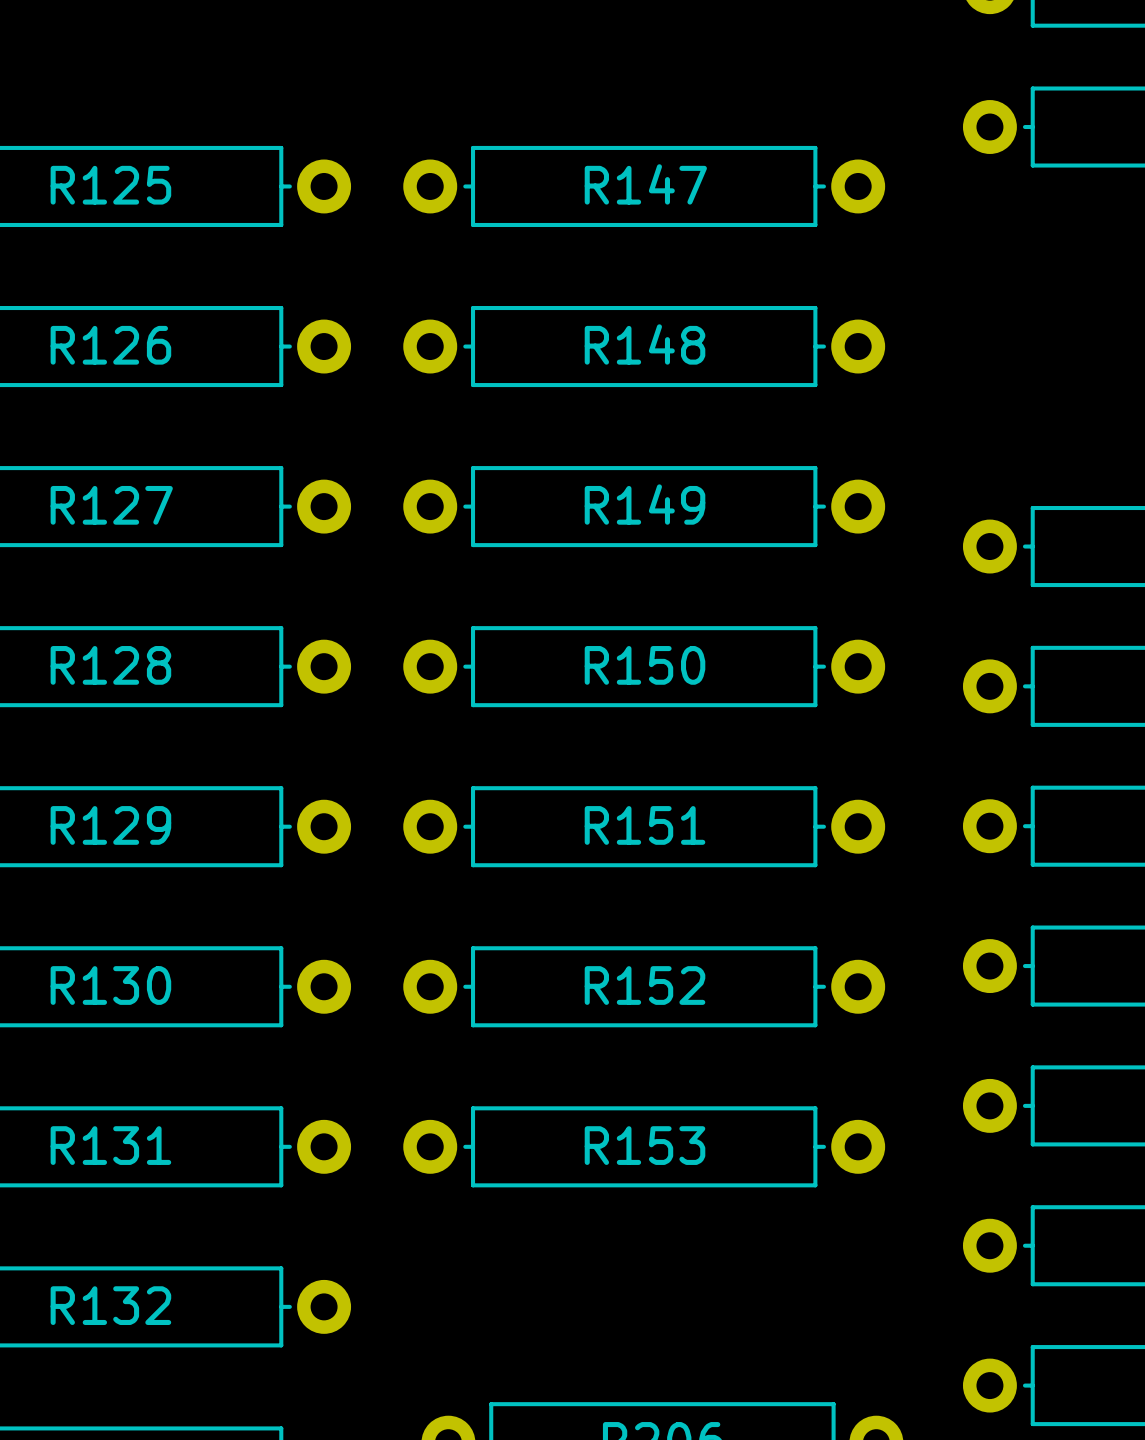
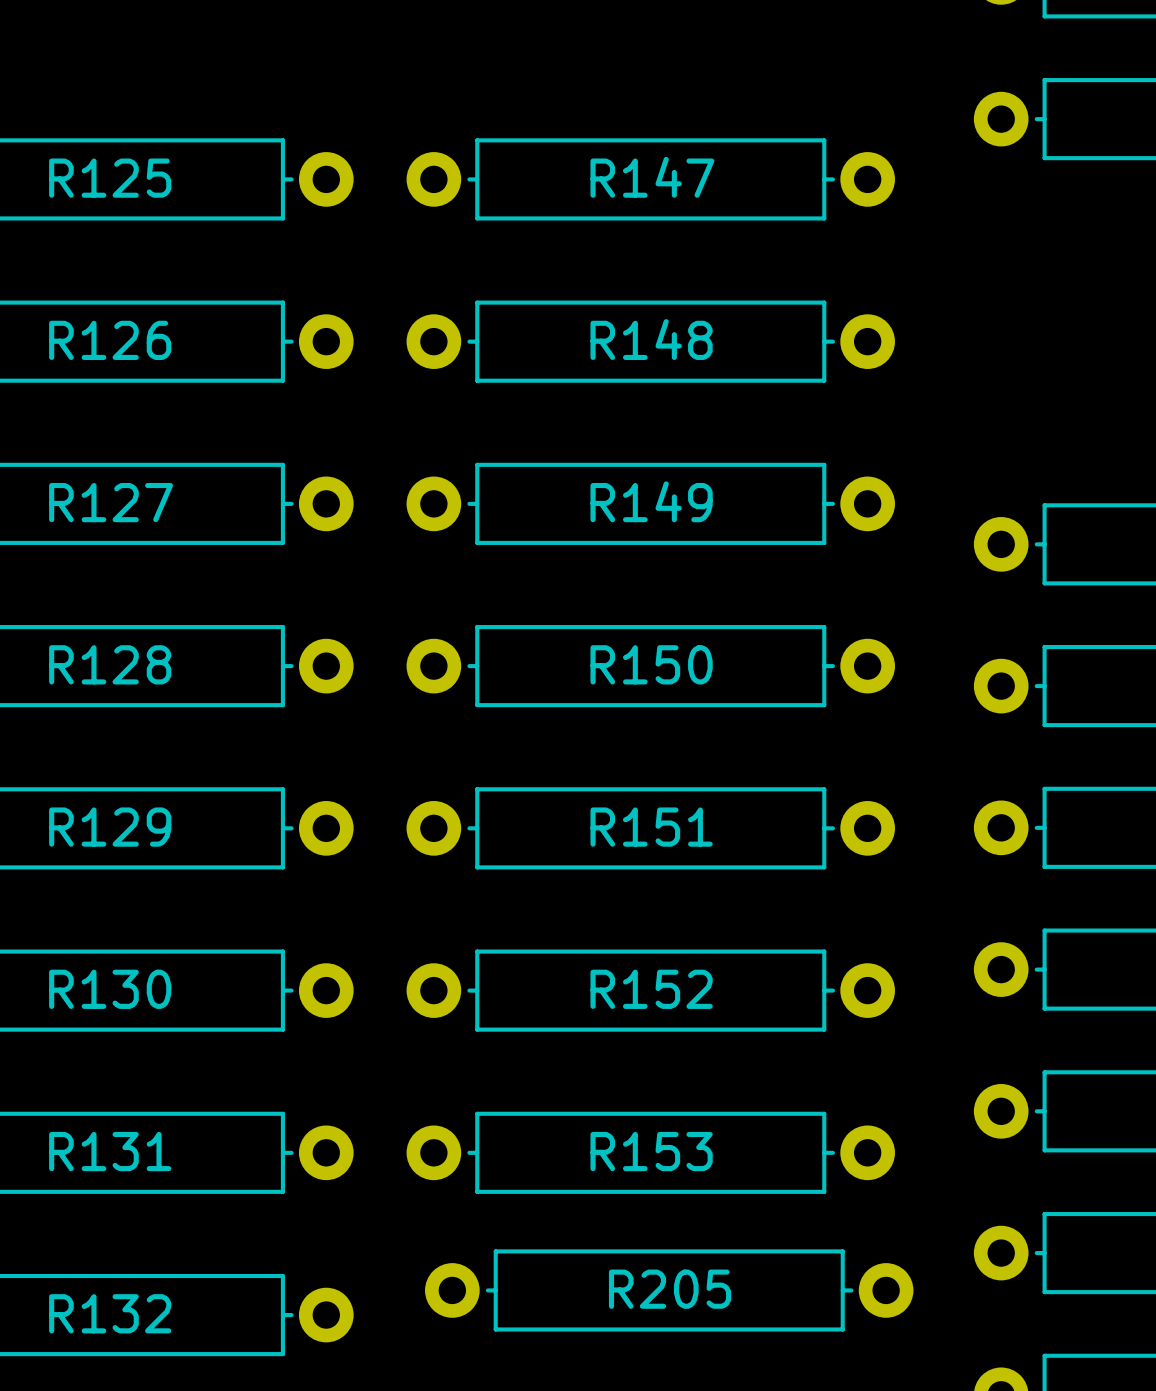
R205: none -> (669, 1290)

